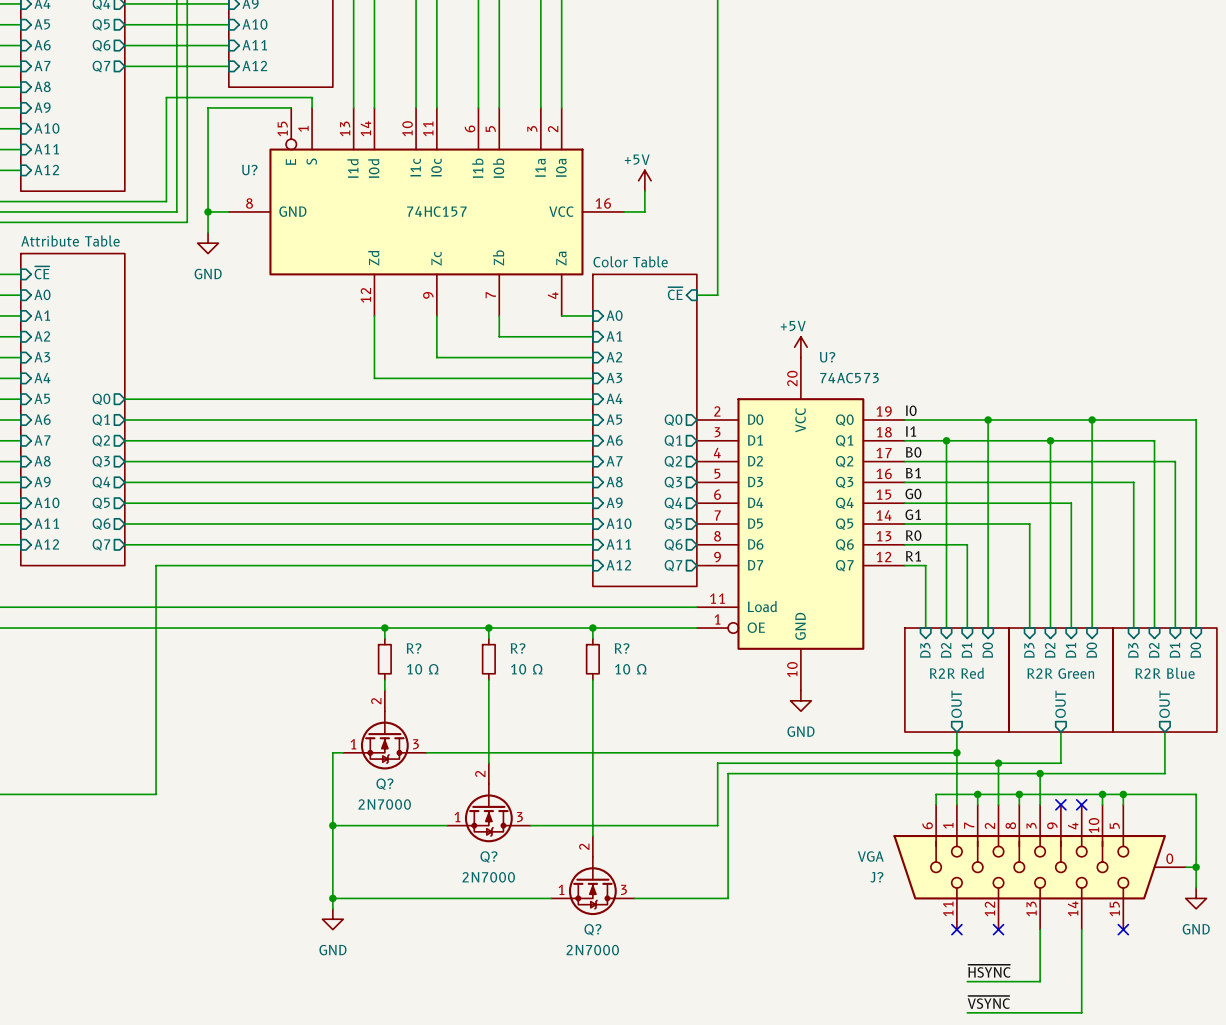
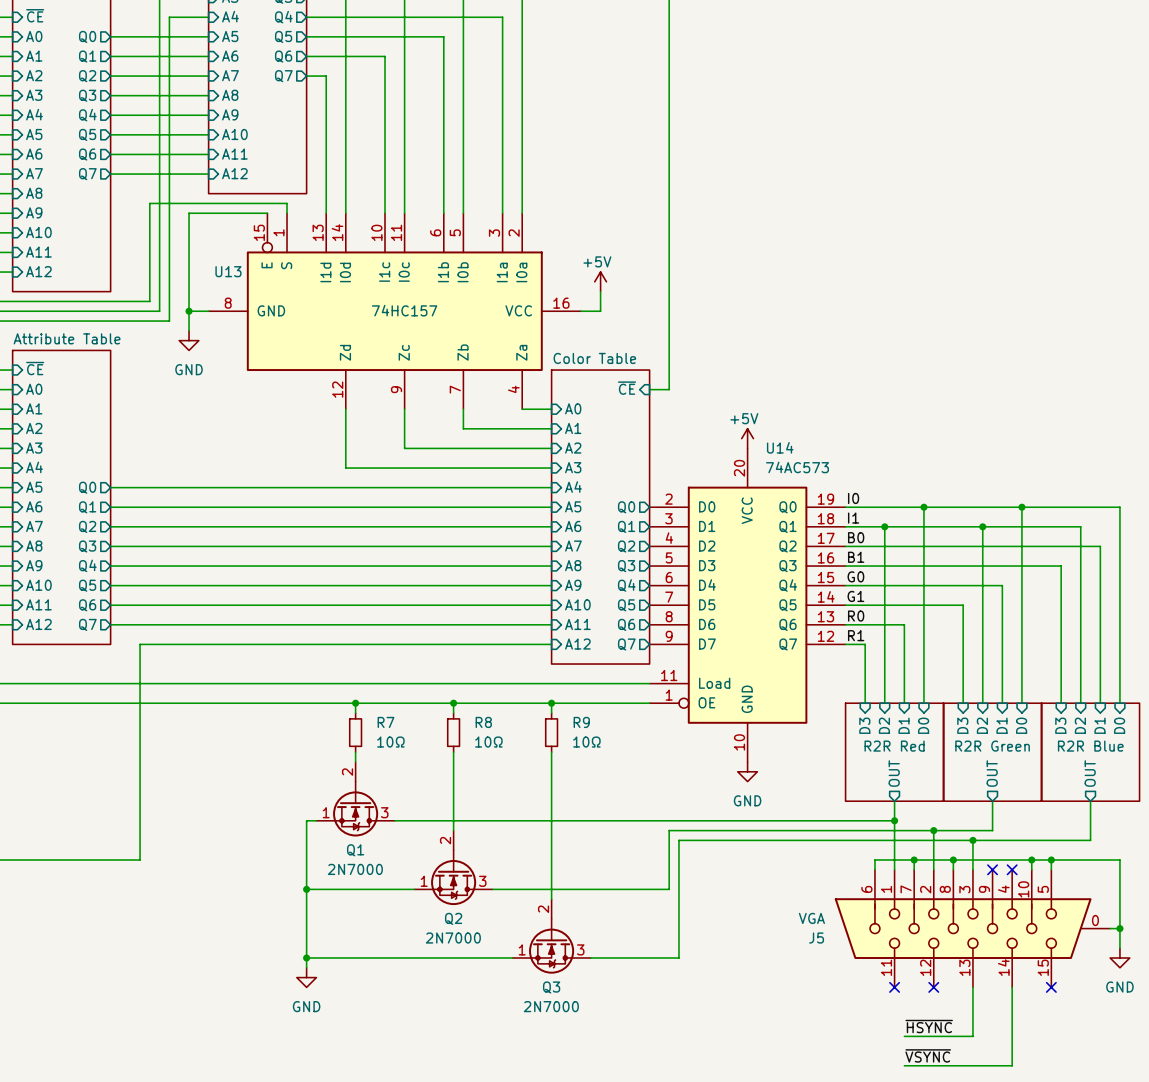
U? name: U? (249, 170) -> U13 (228, 271)
U? name: U? (827, 357) -> U14 (780, 447)
R? name: R? (414, 648) -> R7 (386, 722)
R? name: R? (518, 648) -> R8 (483, 722)
R? name: R? (622, 648) -> R9 (581, 722)
R? value: 10 Ω (422, 669) -> 10Ω (390, 742)
R? value: 10 Ω (526, 669) -> 10Ω (488, 742)
R? value: 10 Ω (630, 669) -> 10Ω (586, 742)
Q? name: Q? (384, 784) -> Q1 (355, 850)
Q? name: Q? (488, 856) -> Q2 (453, 918)
J? name: J? (876, 877) -> J5 (816, 938)
Q? name: Q? (592, 929) -> Q3 (551, 987)

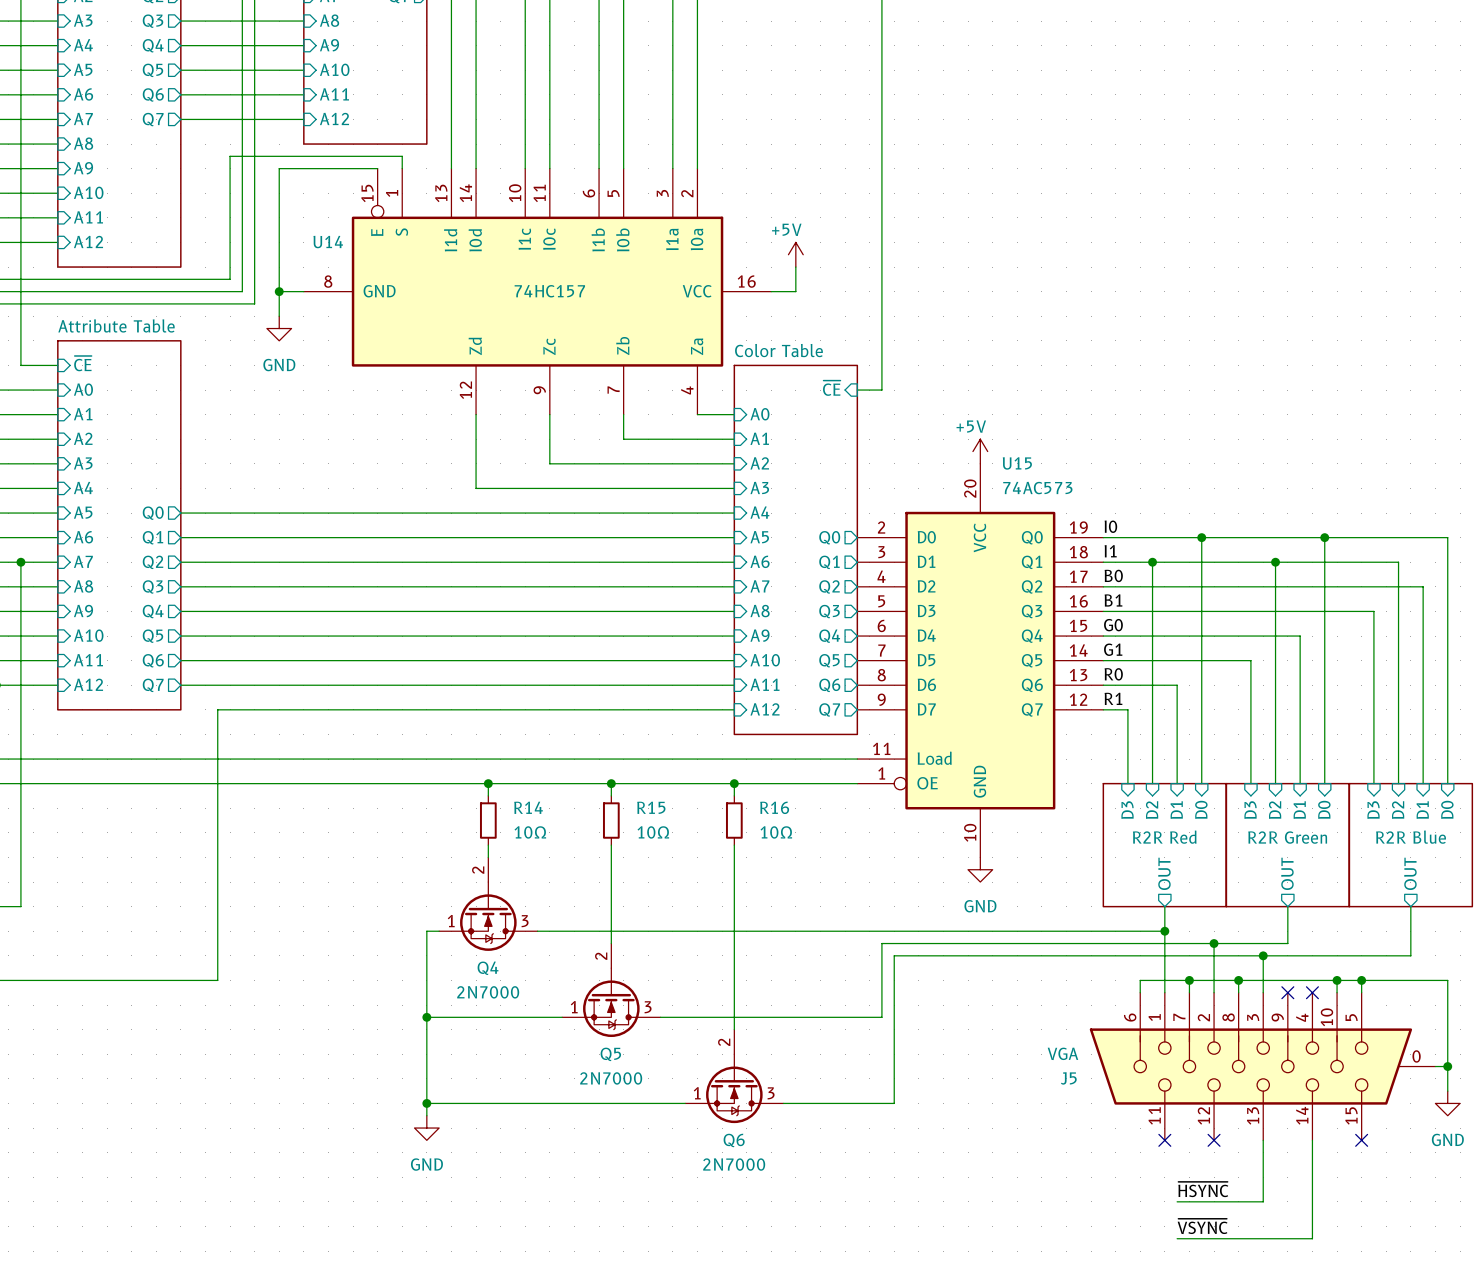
U13 name: U13 (228, 271) -> U14 (328, 242)
U14 name: U14 (780, 447) -> U15 (1017, 463)
R7 name: R7 (386, 722) -> R14 (528, 807)
R8 name: R8 (483, 722) -> R15 (651, 807)
R9 name: R9 (581, 722) -> R16 (774, 807)
Q1 name: Q1 (355, 850) -> Q4 (488, 968)
Q2 name: Q2 (453, 918) -> Q5 (610, 1054)
Q3 name: Q3 (551, 987) -> Q6 (734, 1140)

